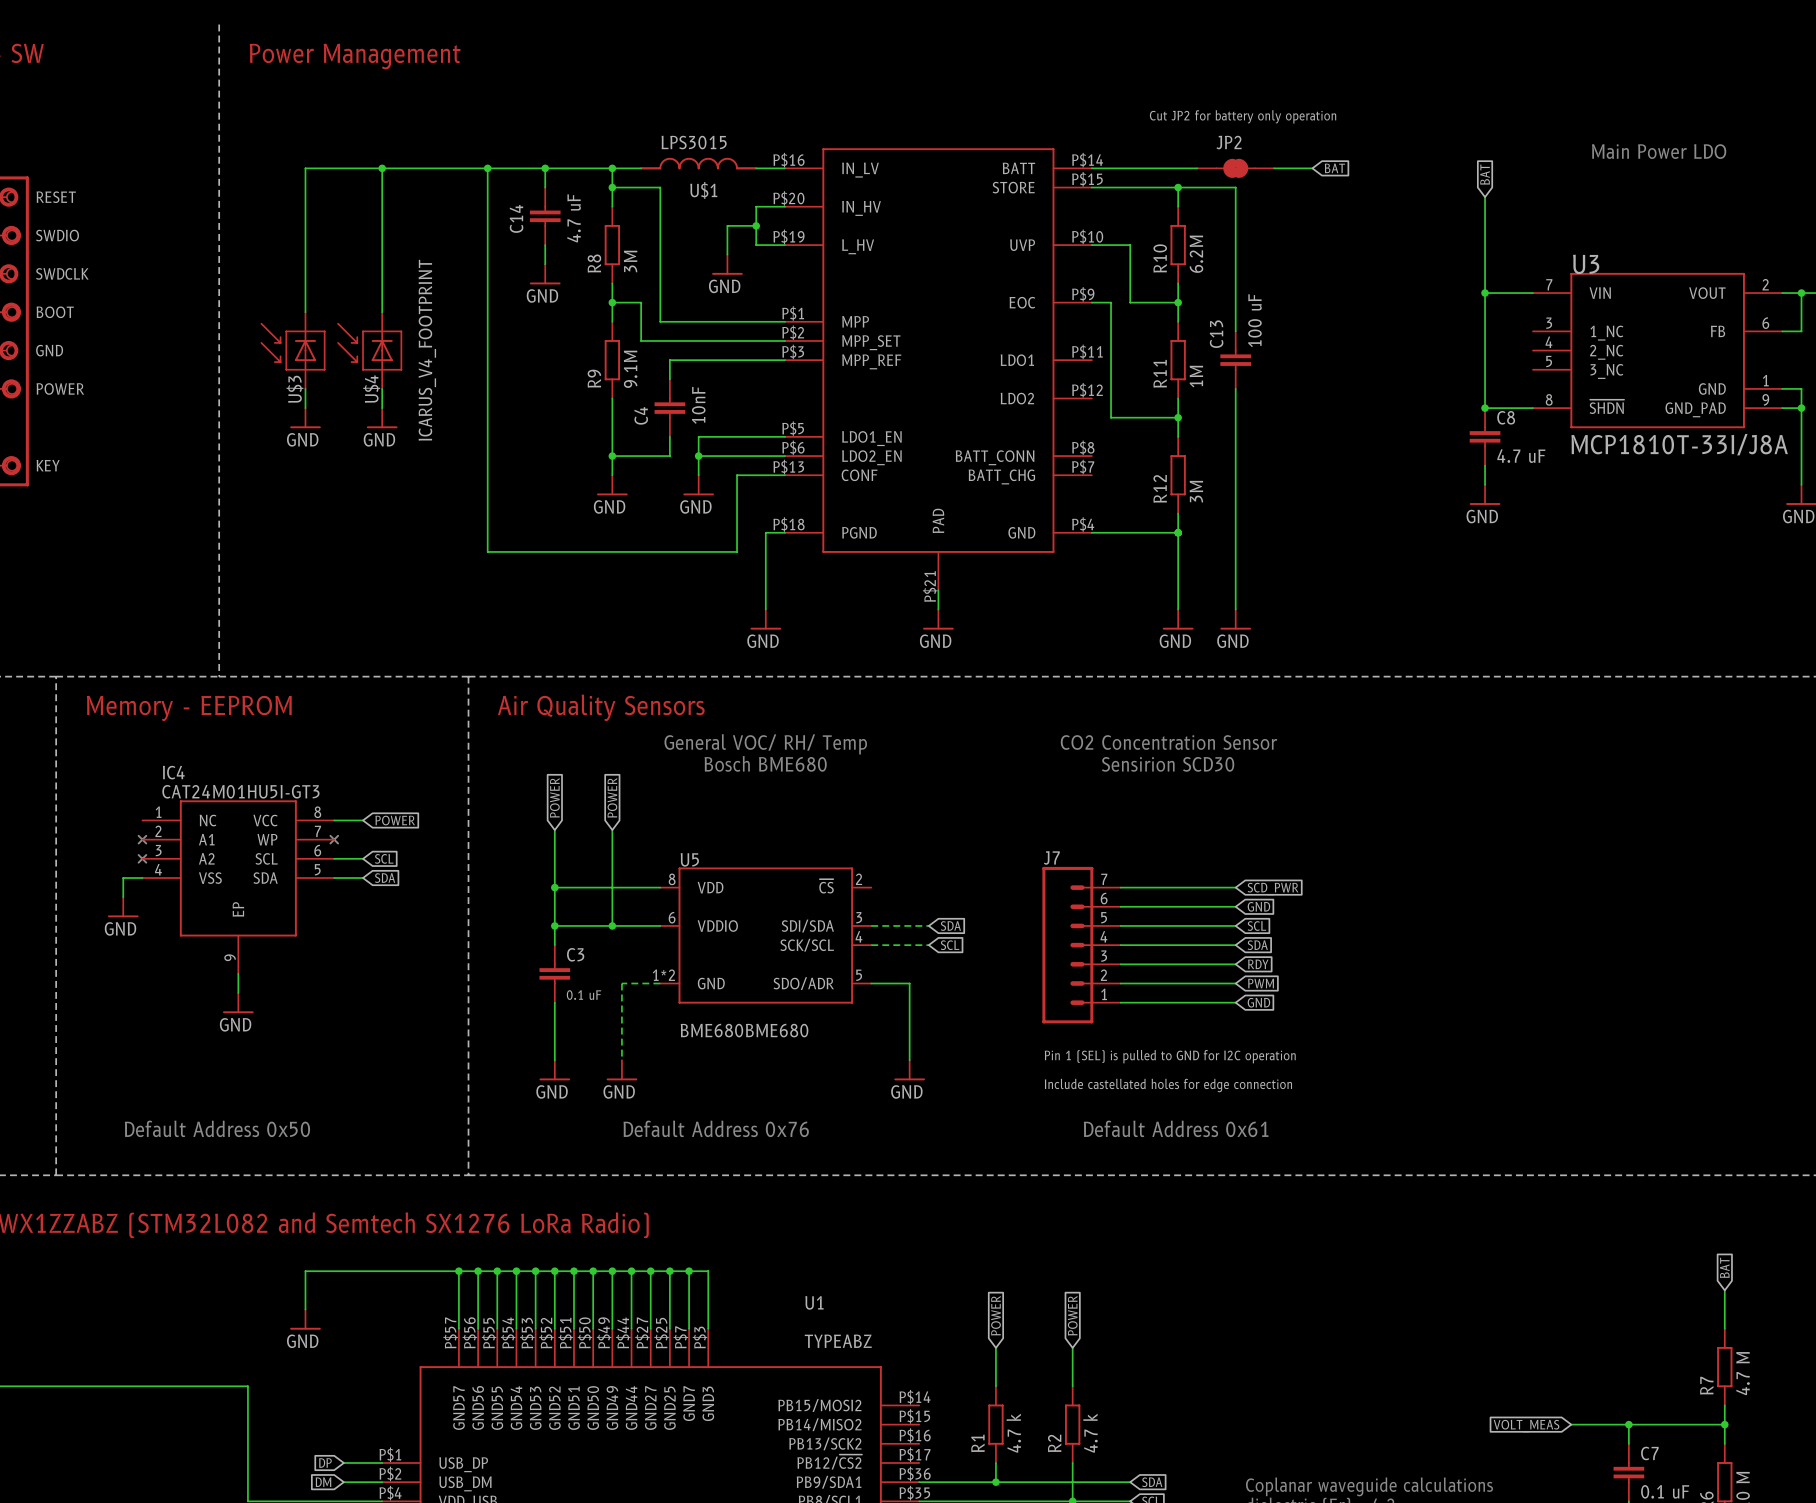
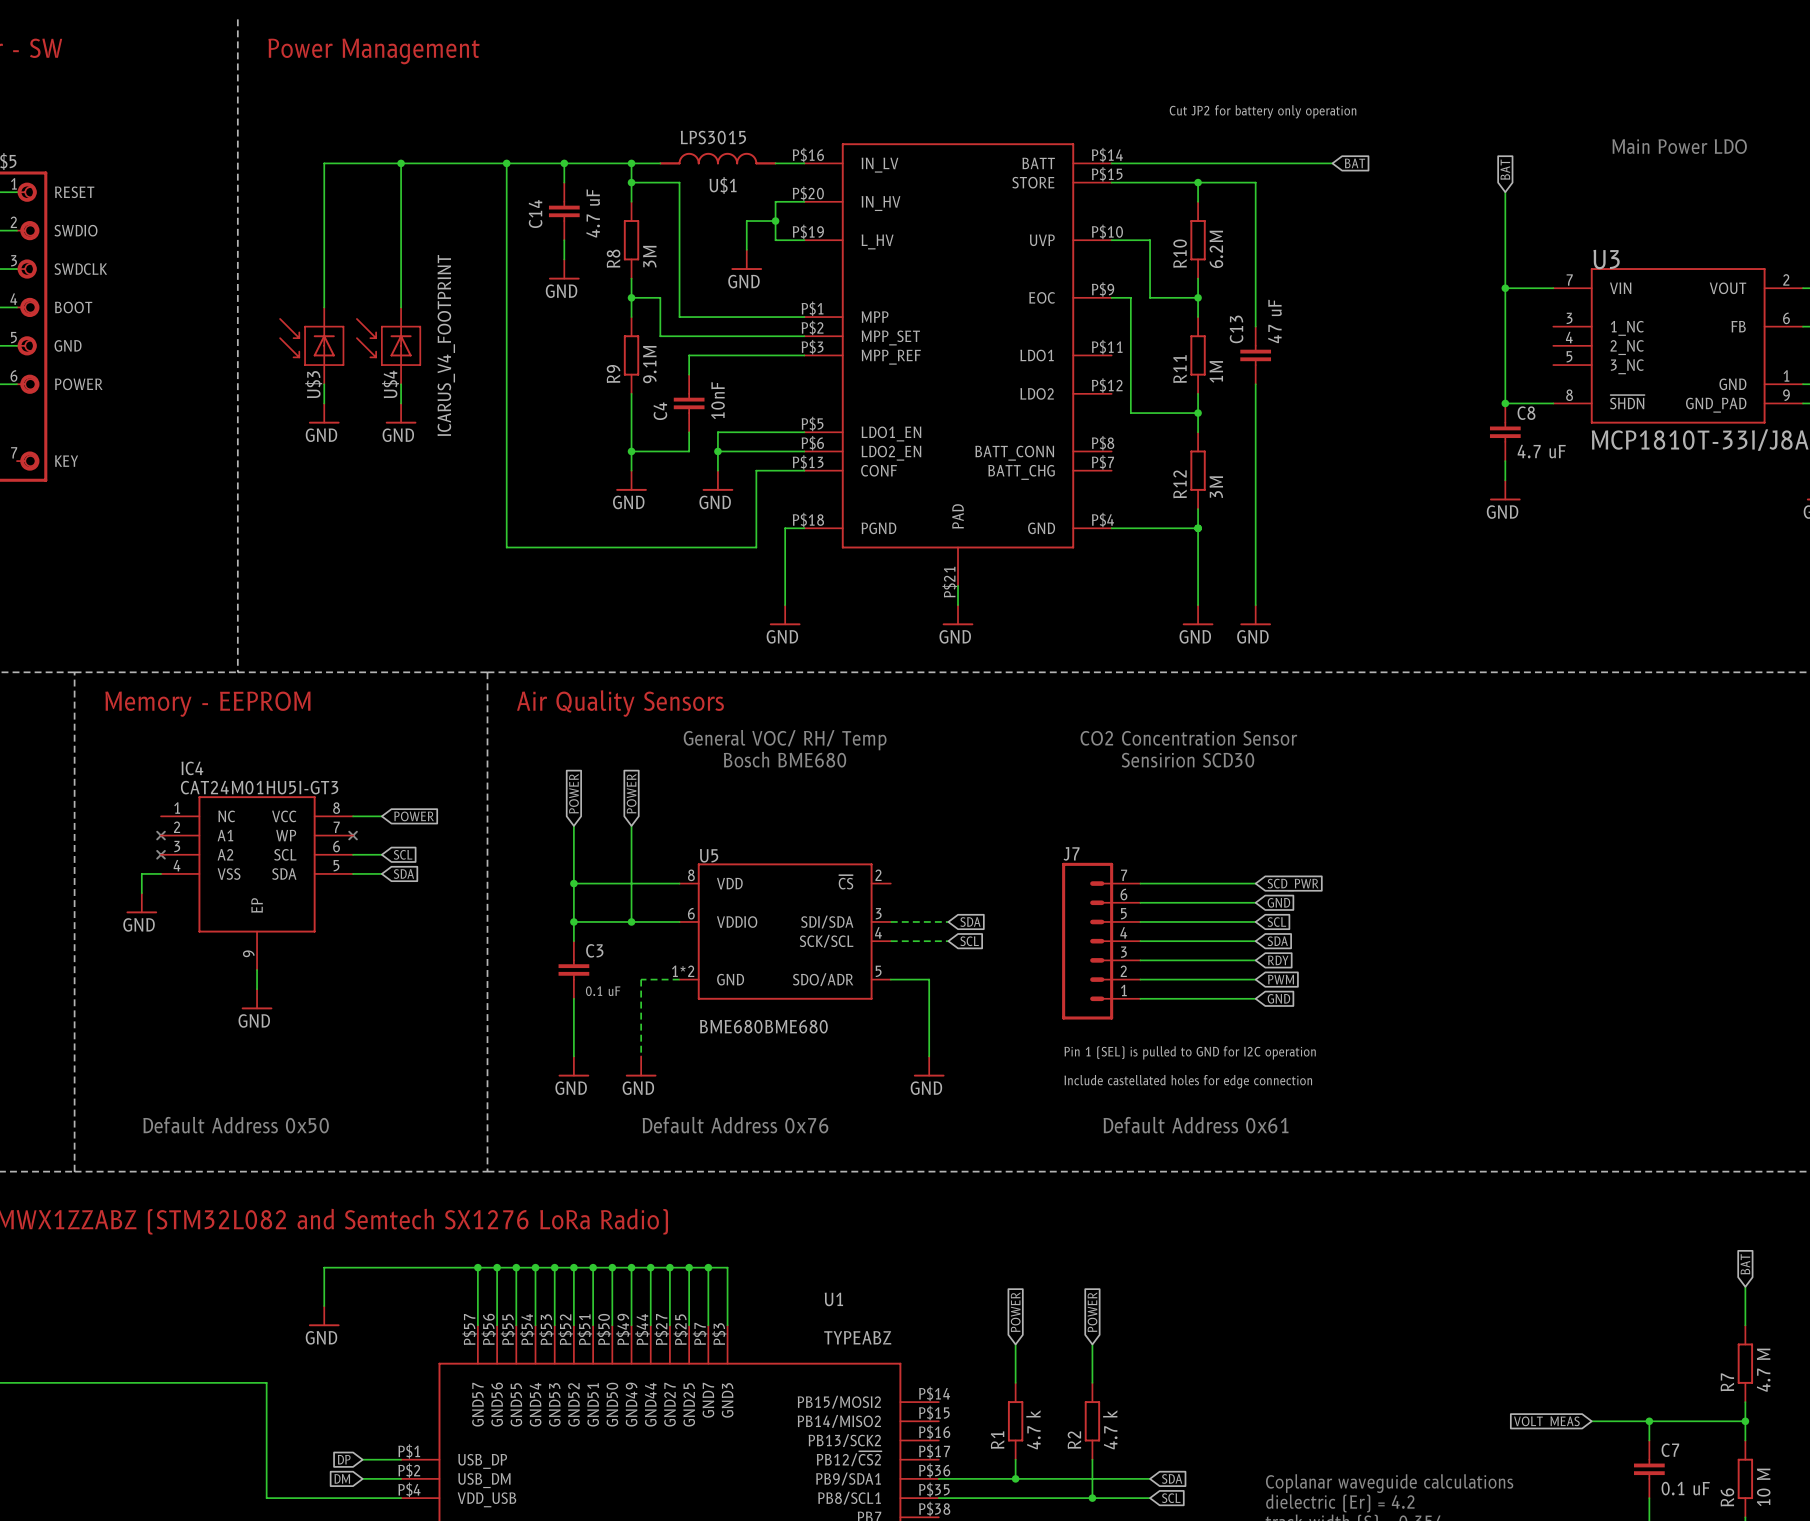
JP2: (1235, 168) -> none
C13 value: 100 uF (1254, 320) -> 47 uF (1274, 321)

